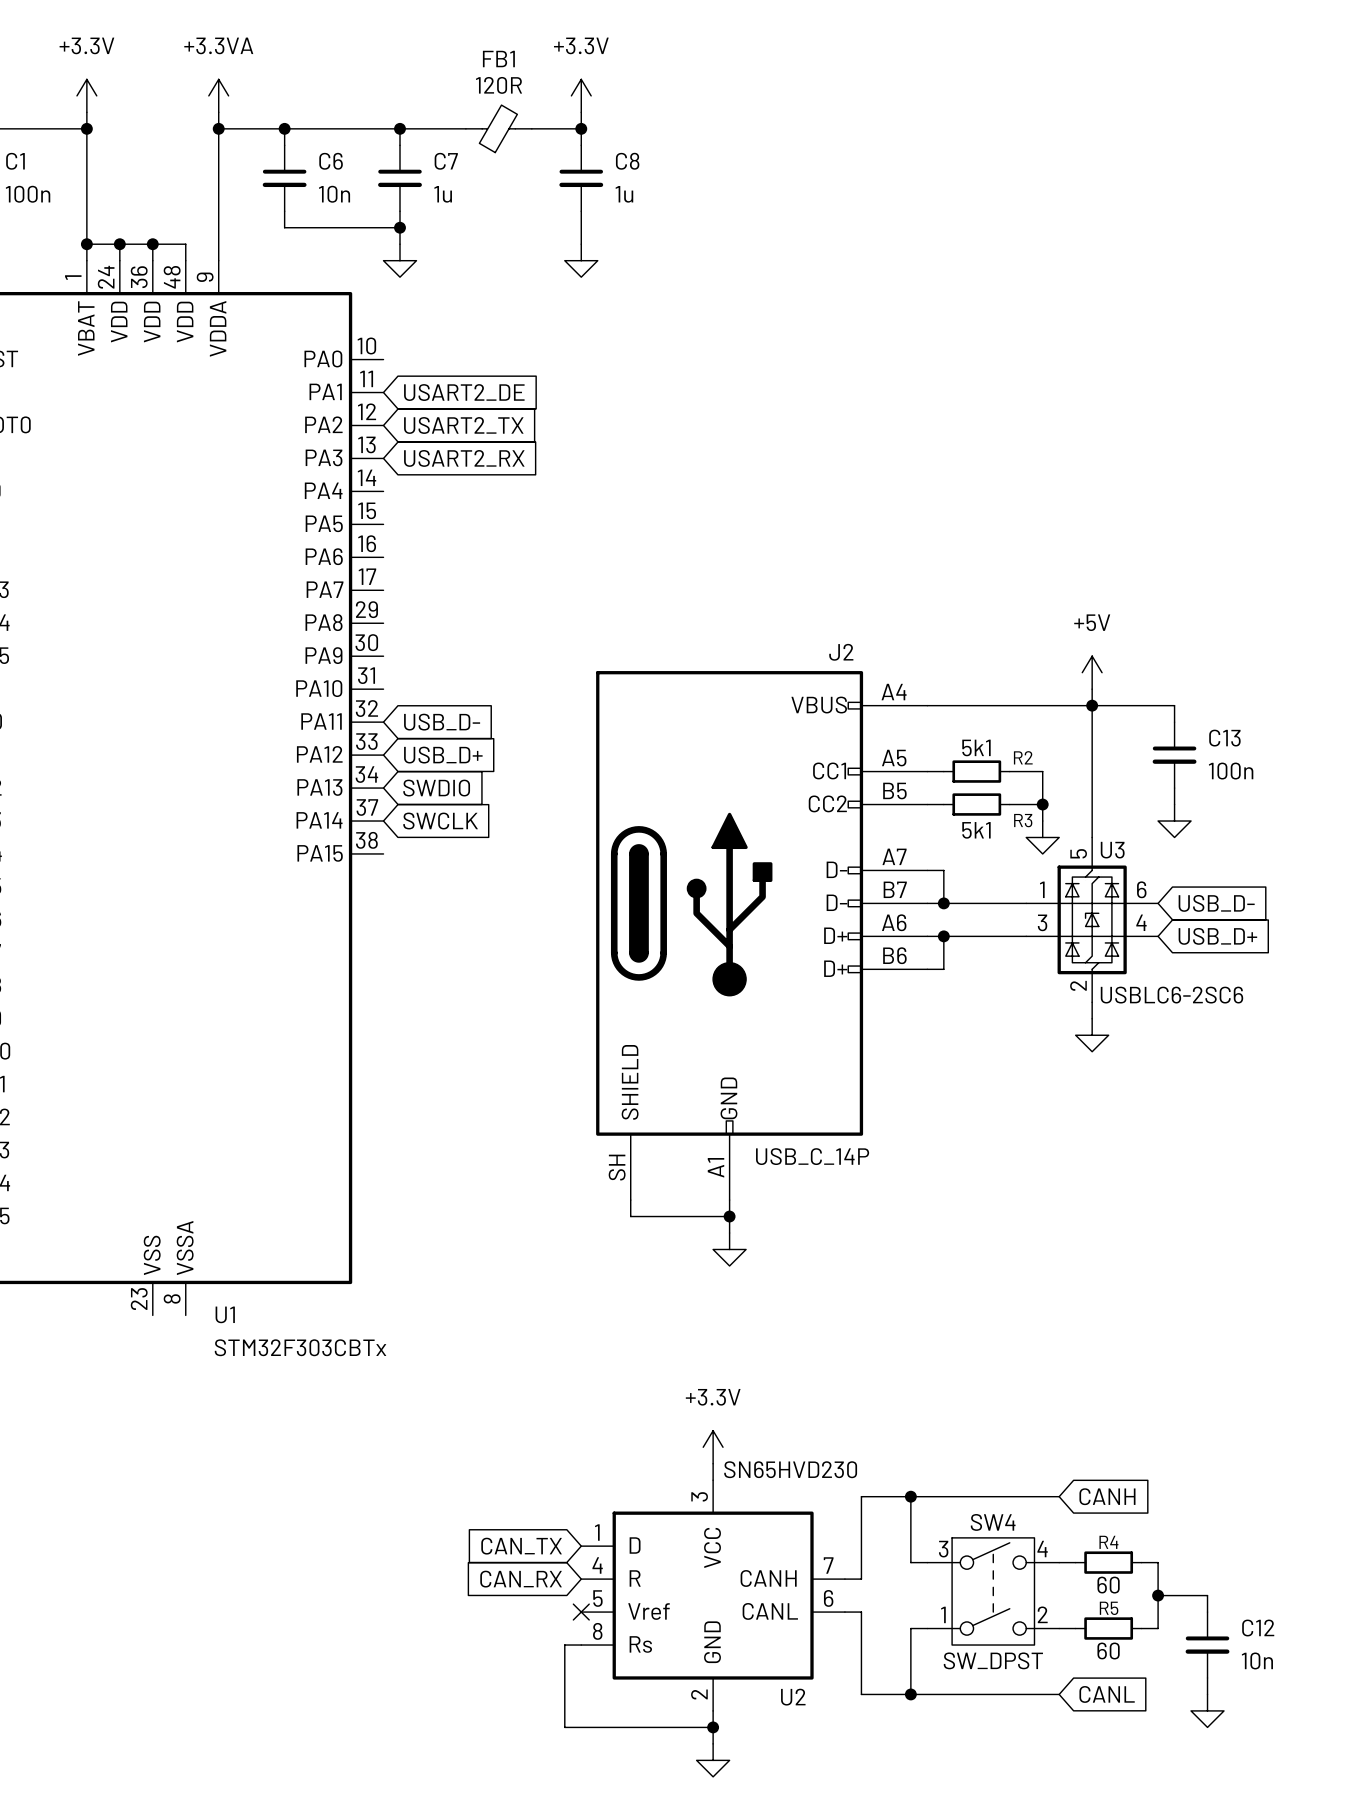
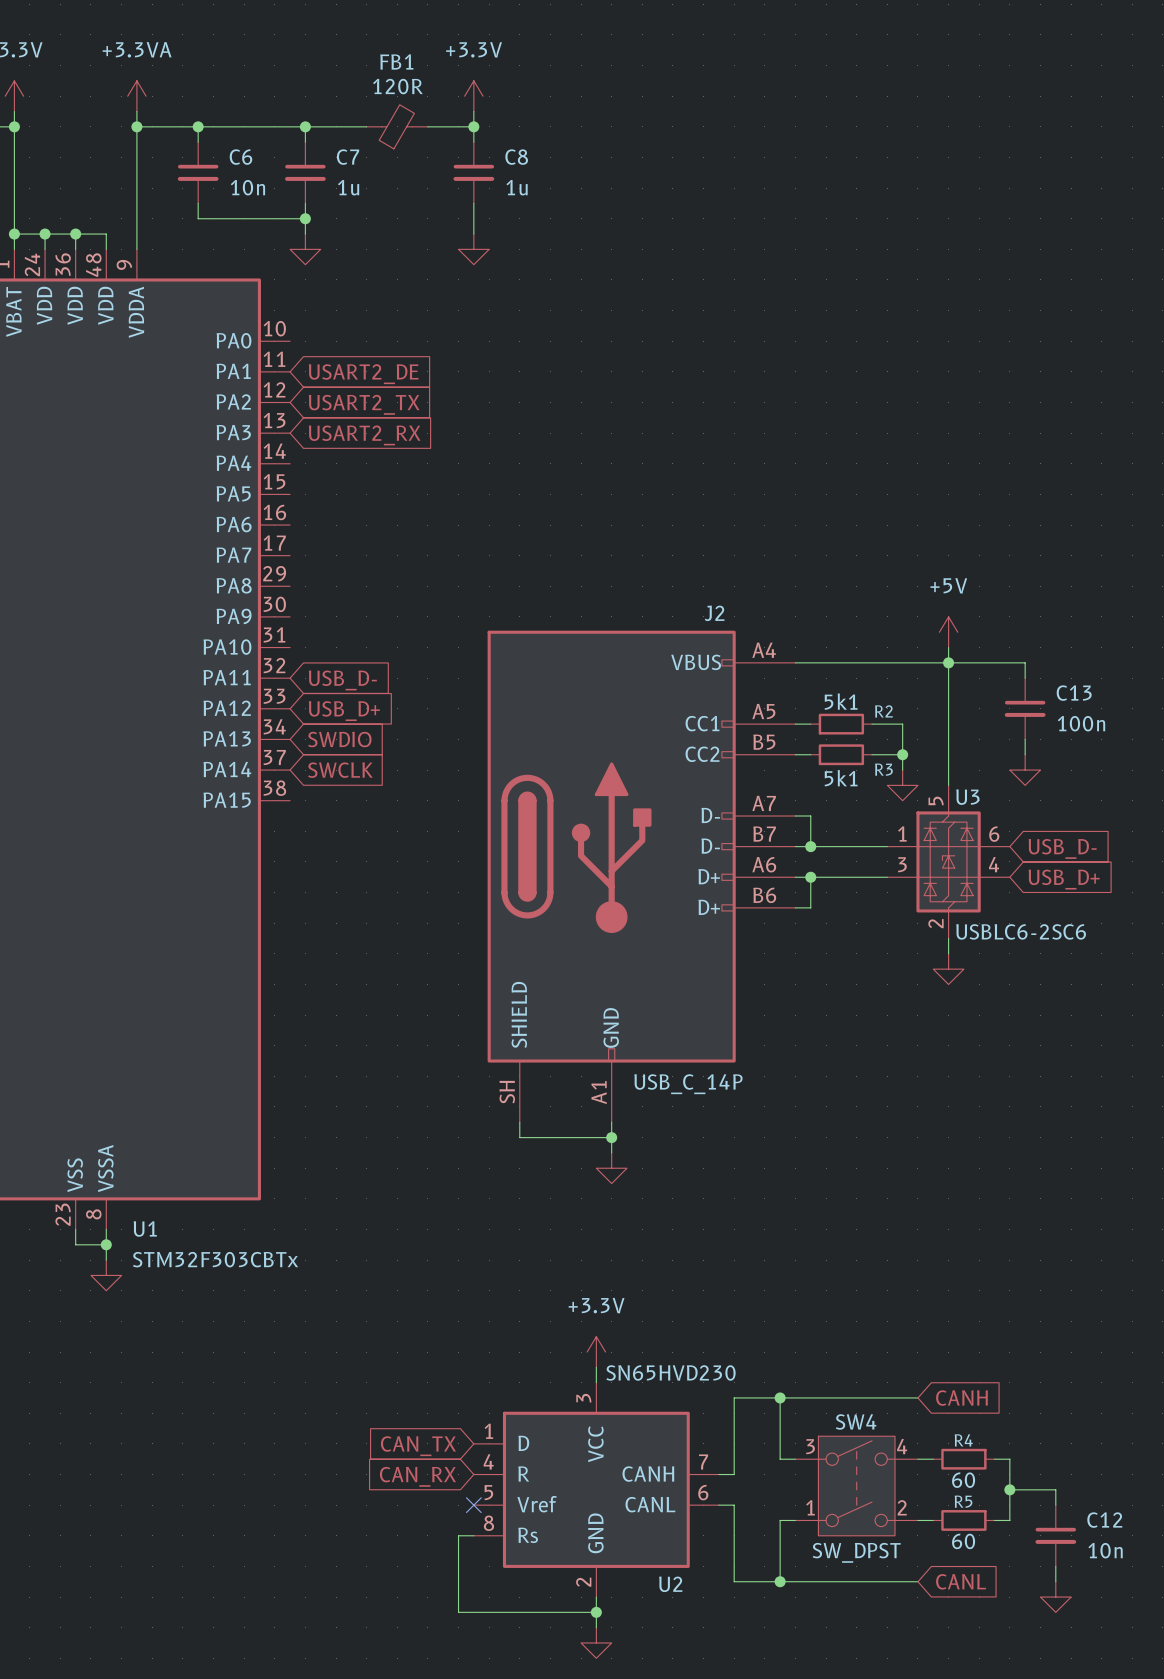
wire: none -> (75, 1229) (75, 1244) (106, 1244)
wire: none -> (106, 1229) (106, 1260)
junction: none -> (106, 1244)
power symbol: none -> (106, 1275)

